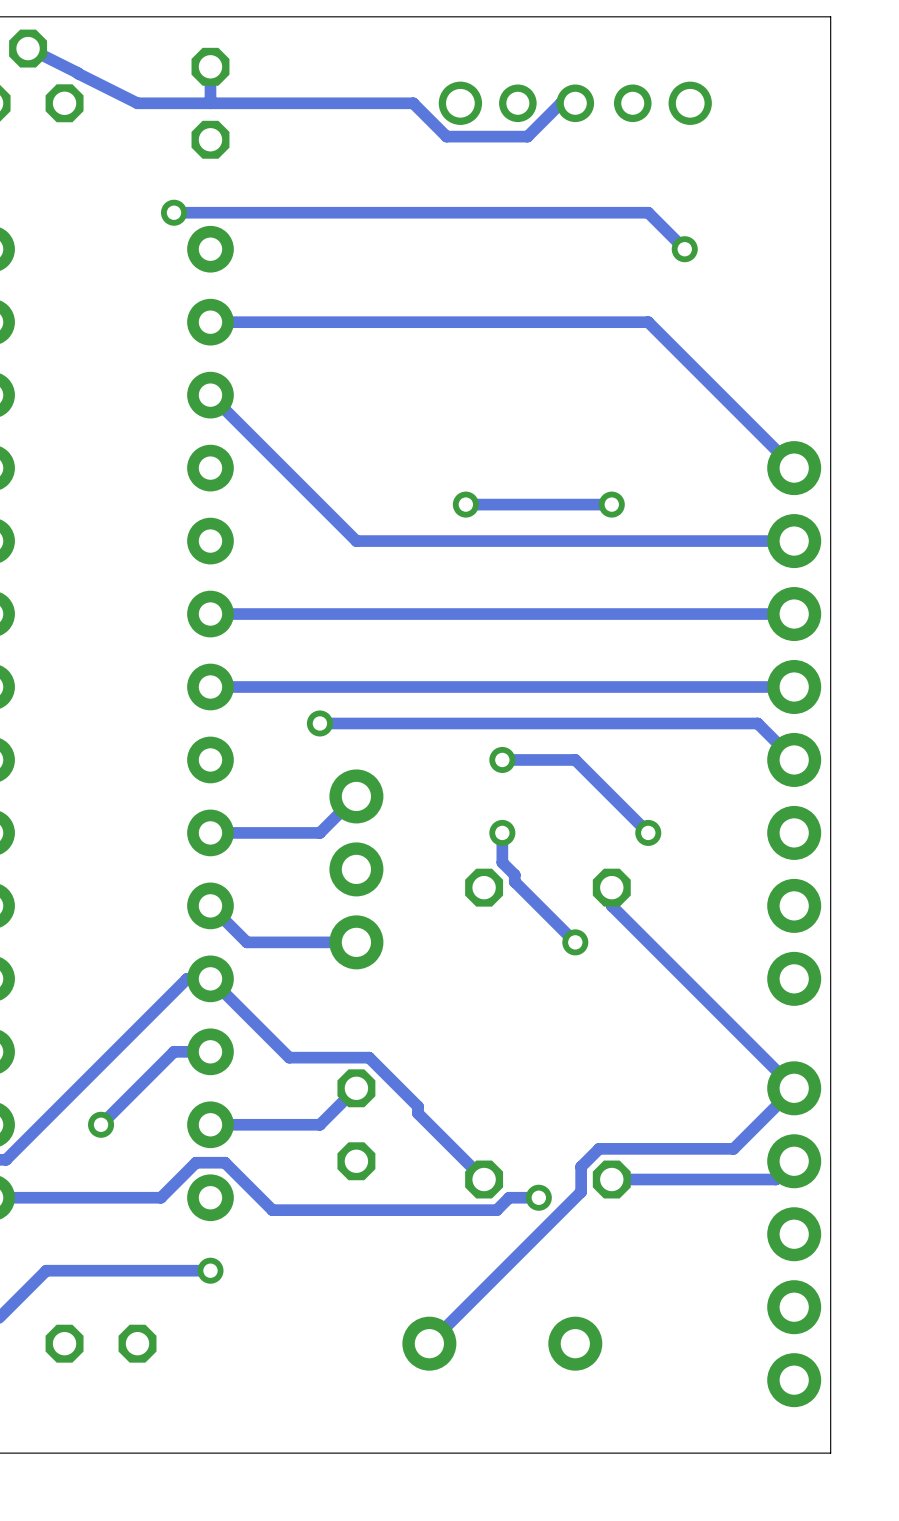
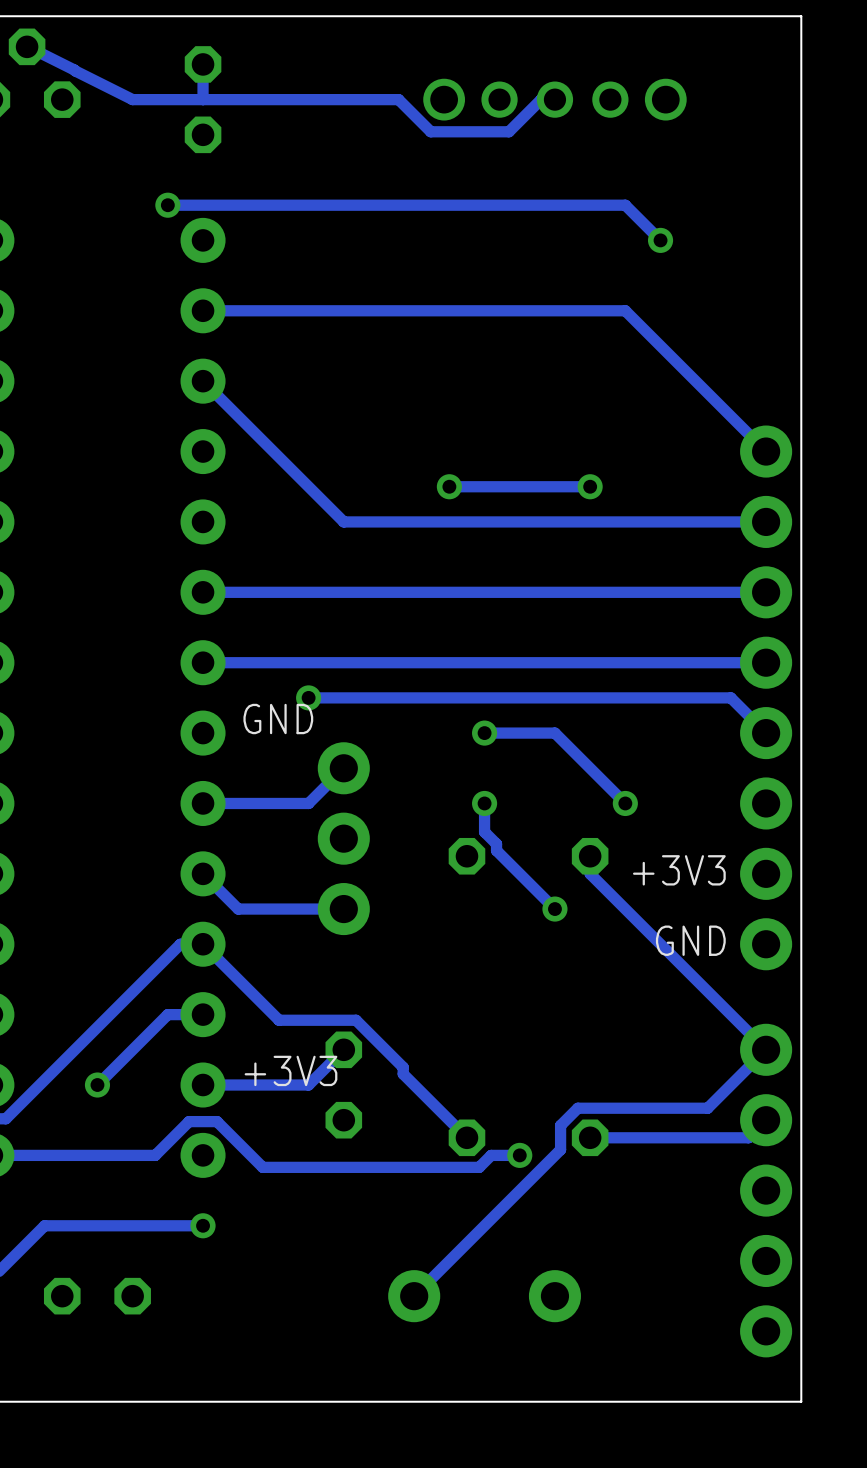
text: none -> GND (278, 719)
text: none -> +3V3 (679, 870)
text: none -> GND (690, 940)
text: none -> +3V3 (290, 1070)

